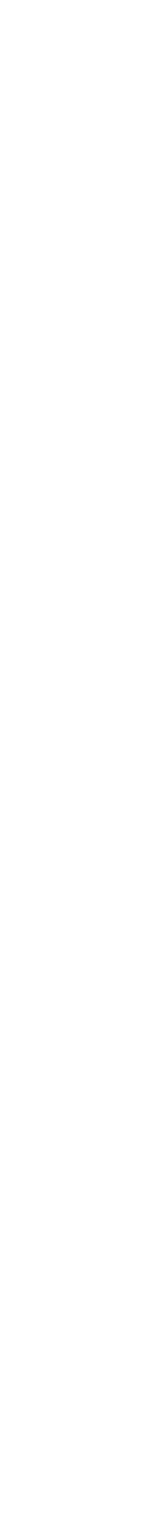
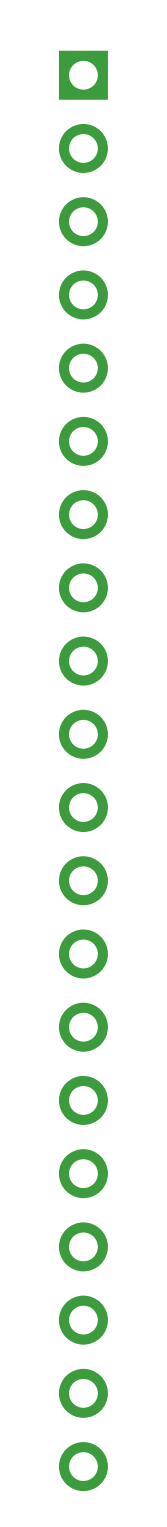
part: none -> (83, 770)

